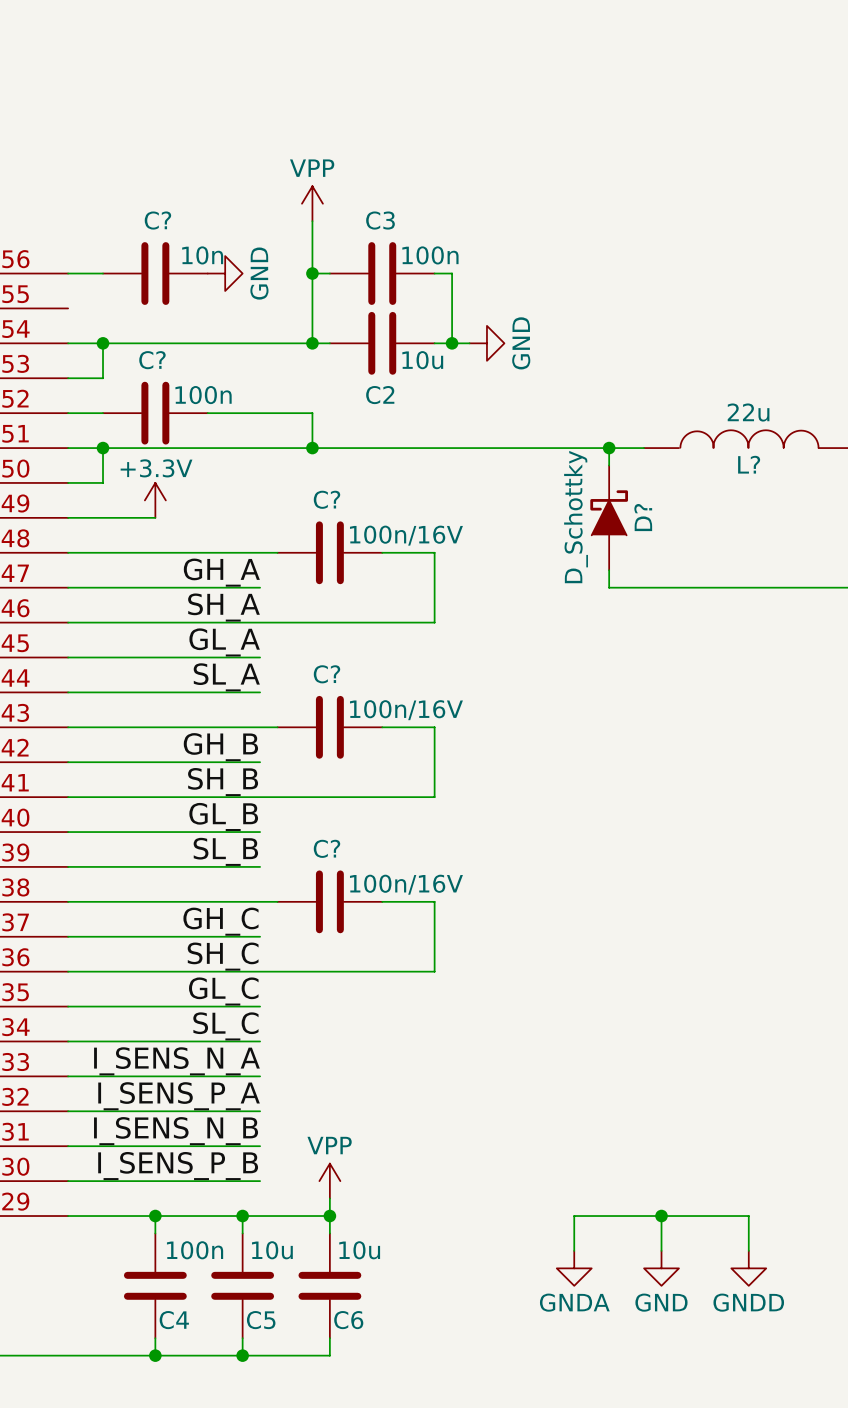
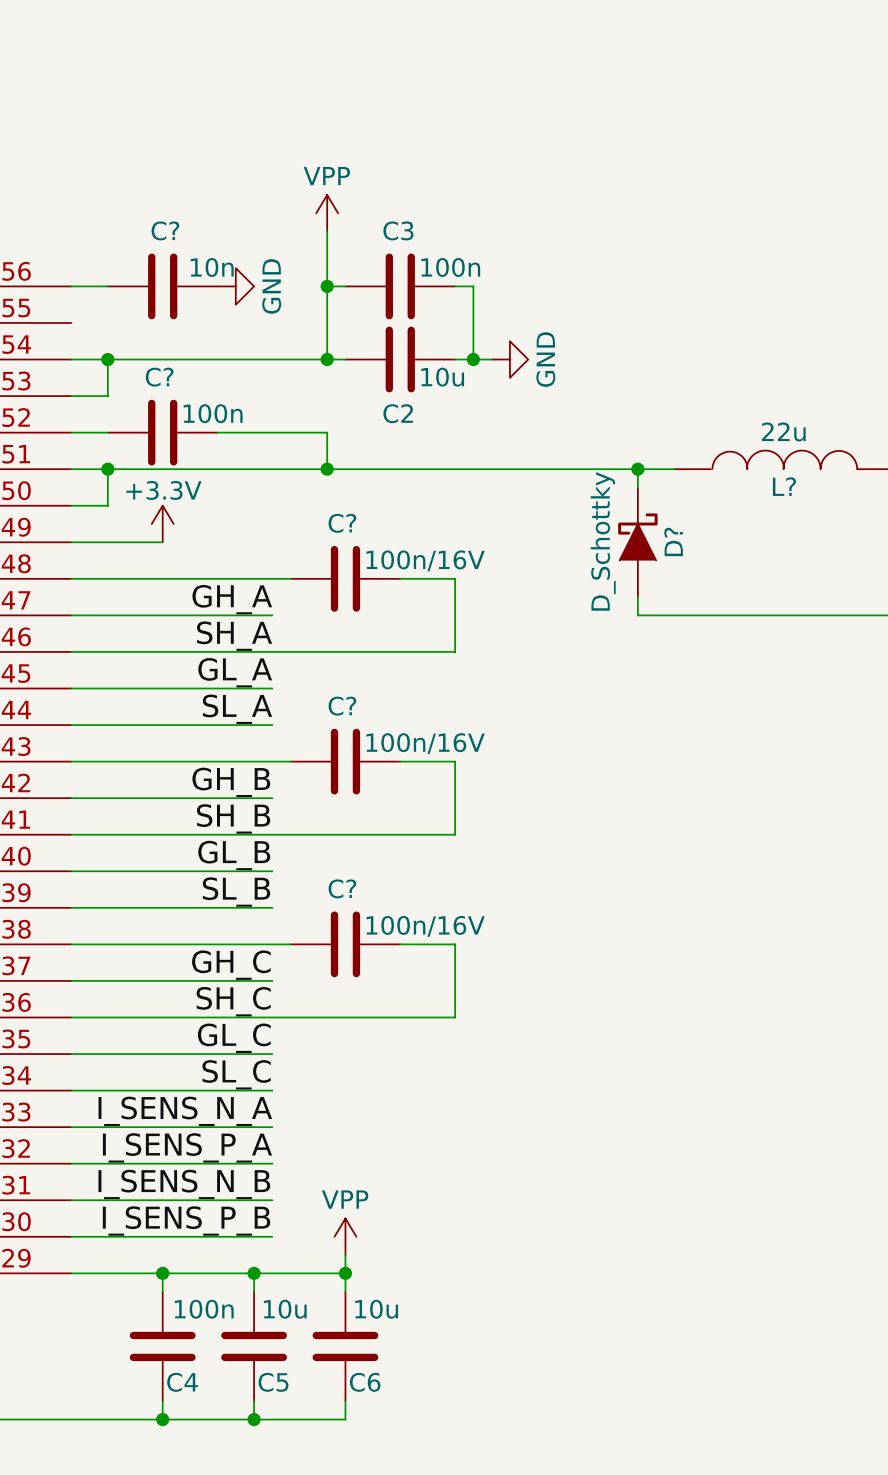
wire: (661, 1216) (661, 1250) -> none
junction: (661, 1216) -> none
wire: (574, 1250) (574, 1216) (748, 1216) (748, 1250) -> none
power symbol: GNDA (574, 1268) -> none
power symbol: GND (661, 1268) -> none
power symbol: GNDD (748, 1268) -> none

